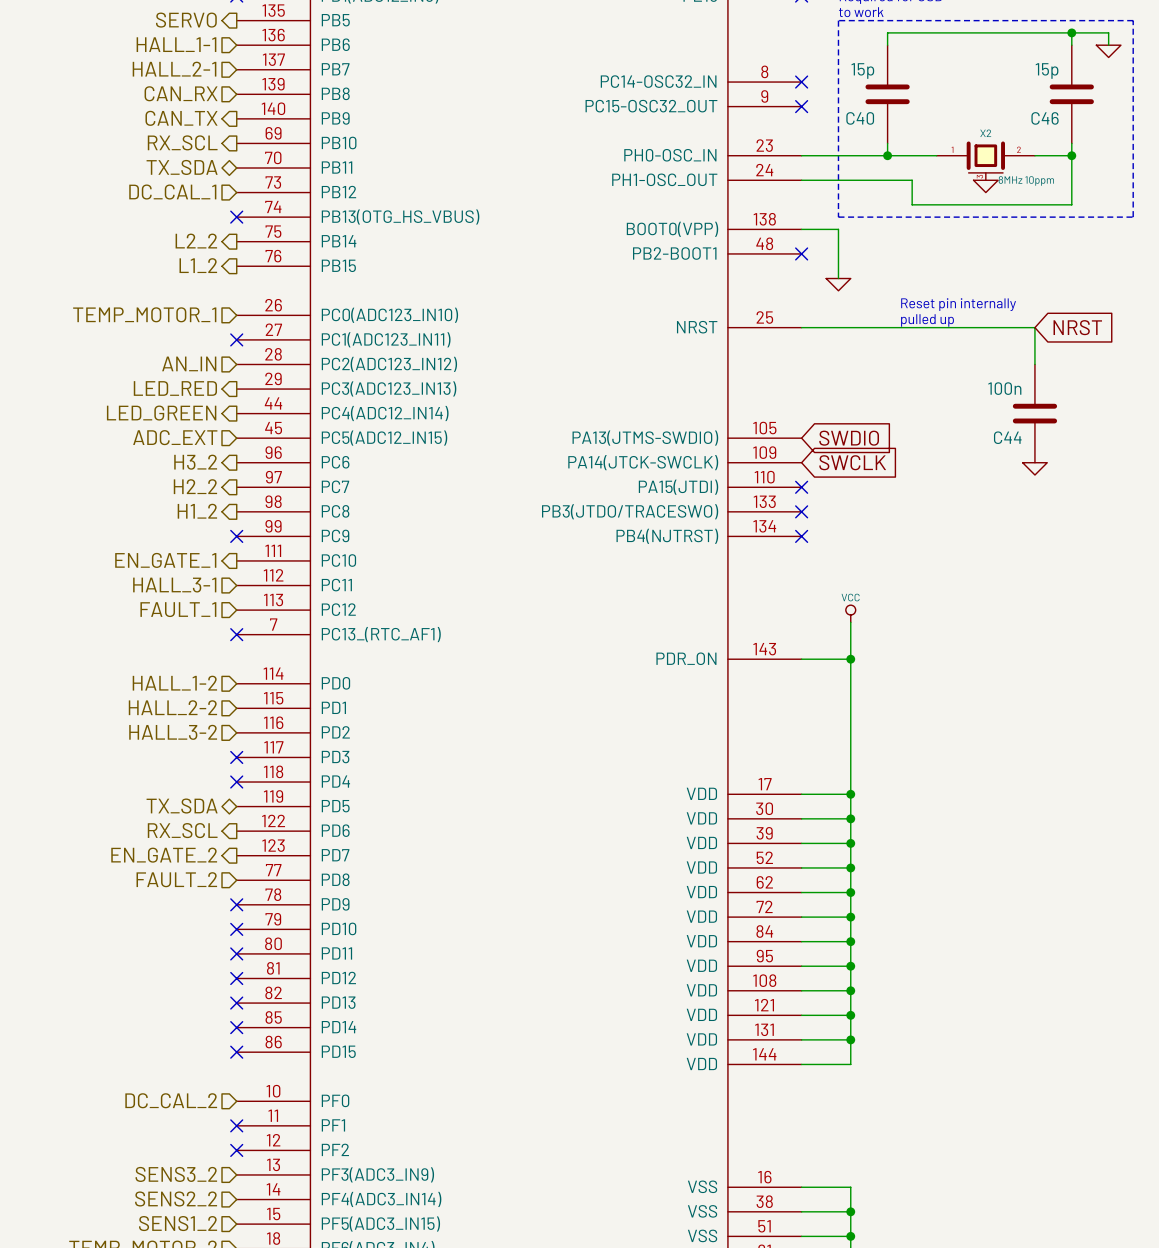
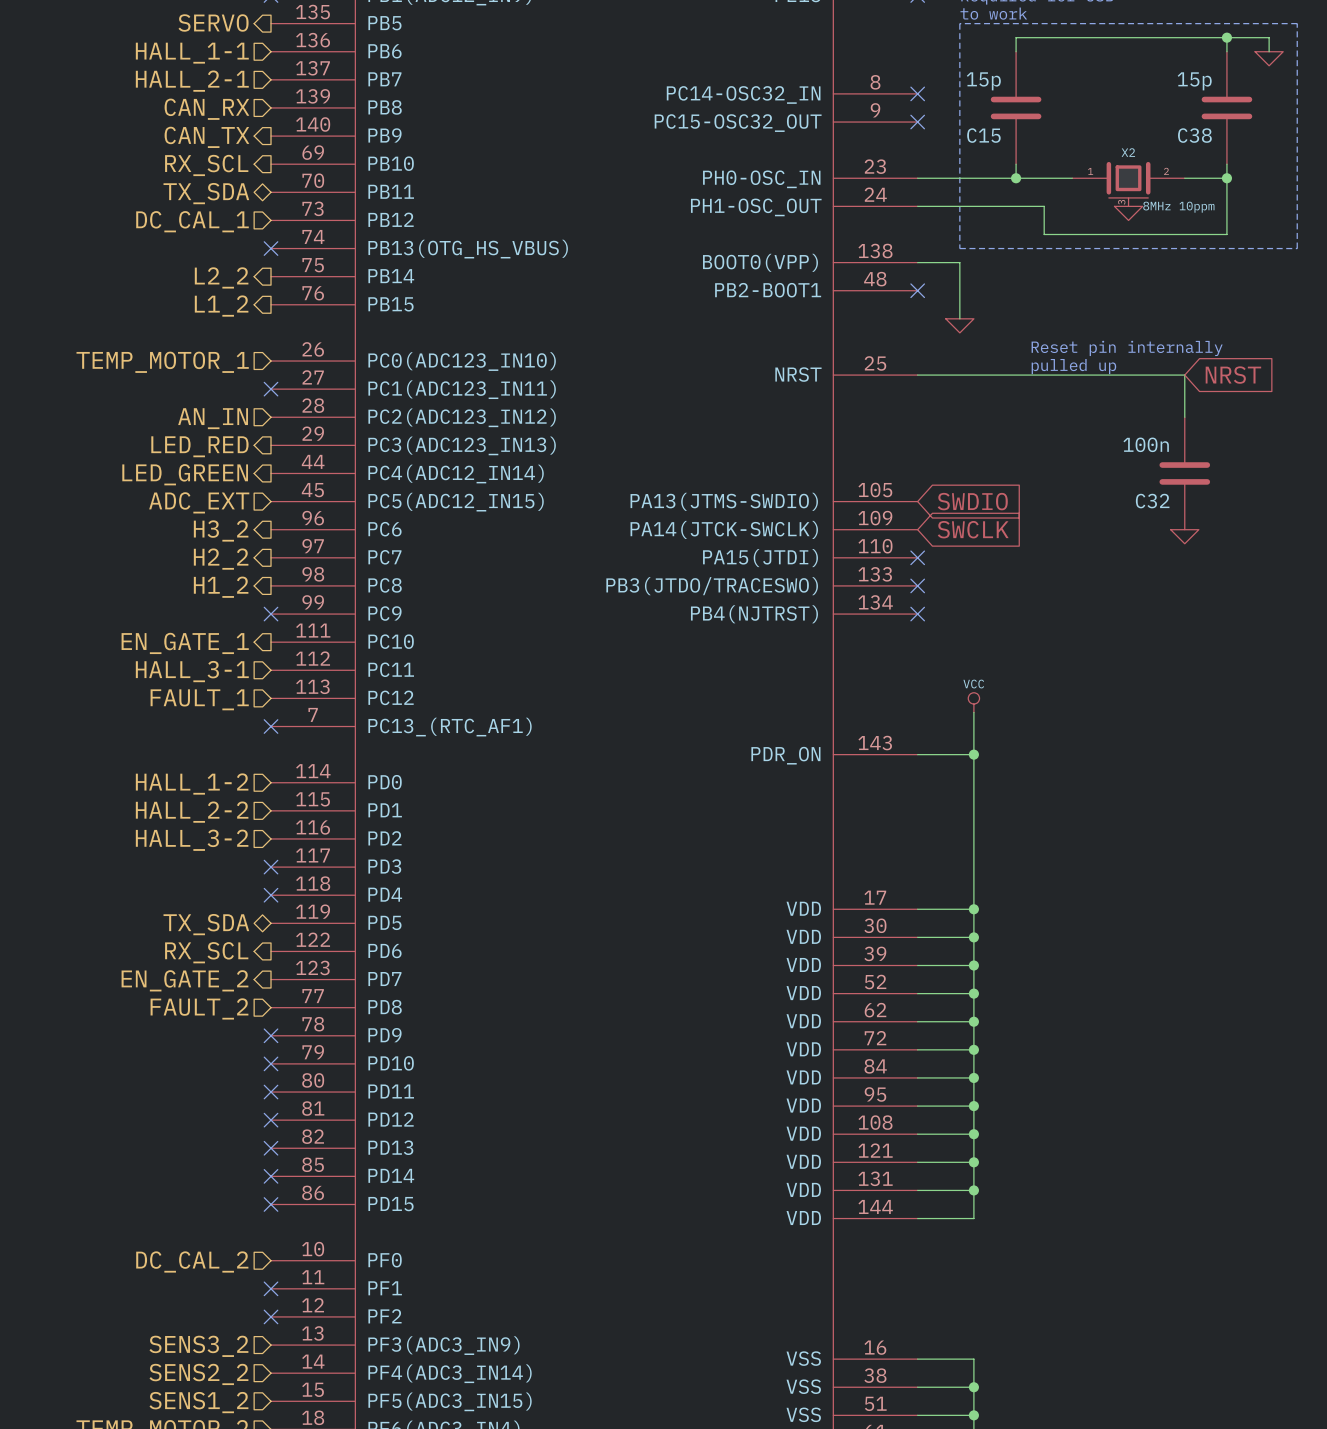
C40 name: C40 (860, 118) -> C15 (983, 135)
C46 name: C46 (1045, 118) -> C38 (1194, 135)
C44 name: C44 (1007, 437) -> C32 (1152, 501)

